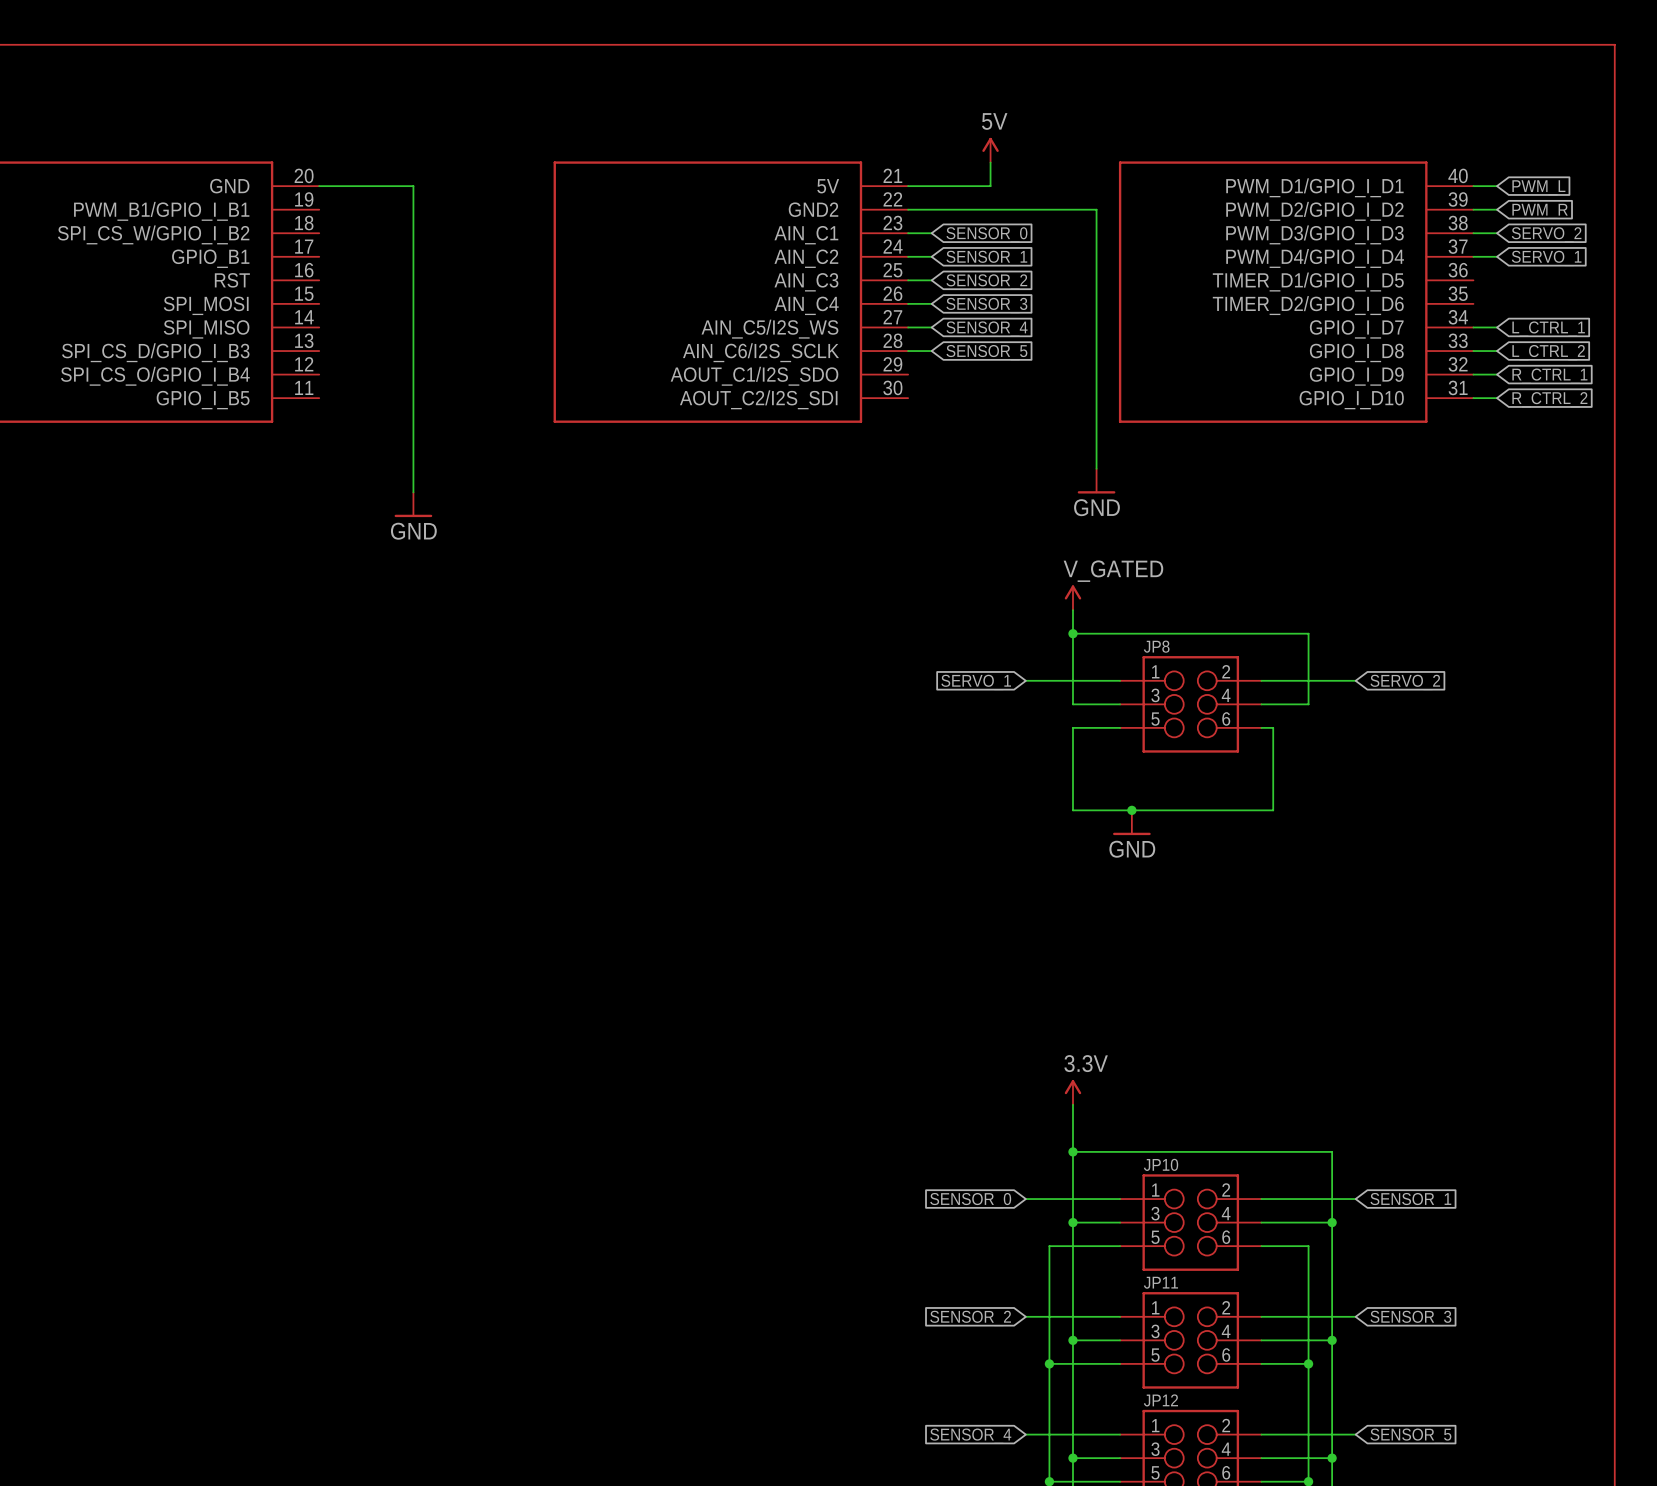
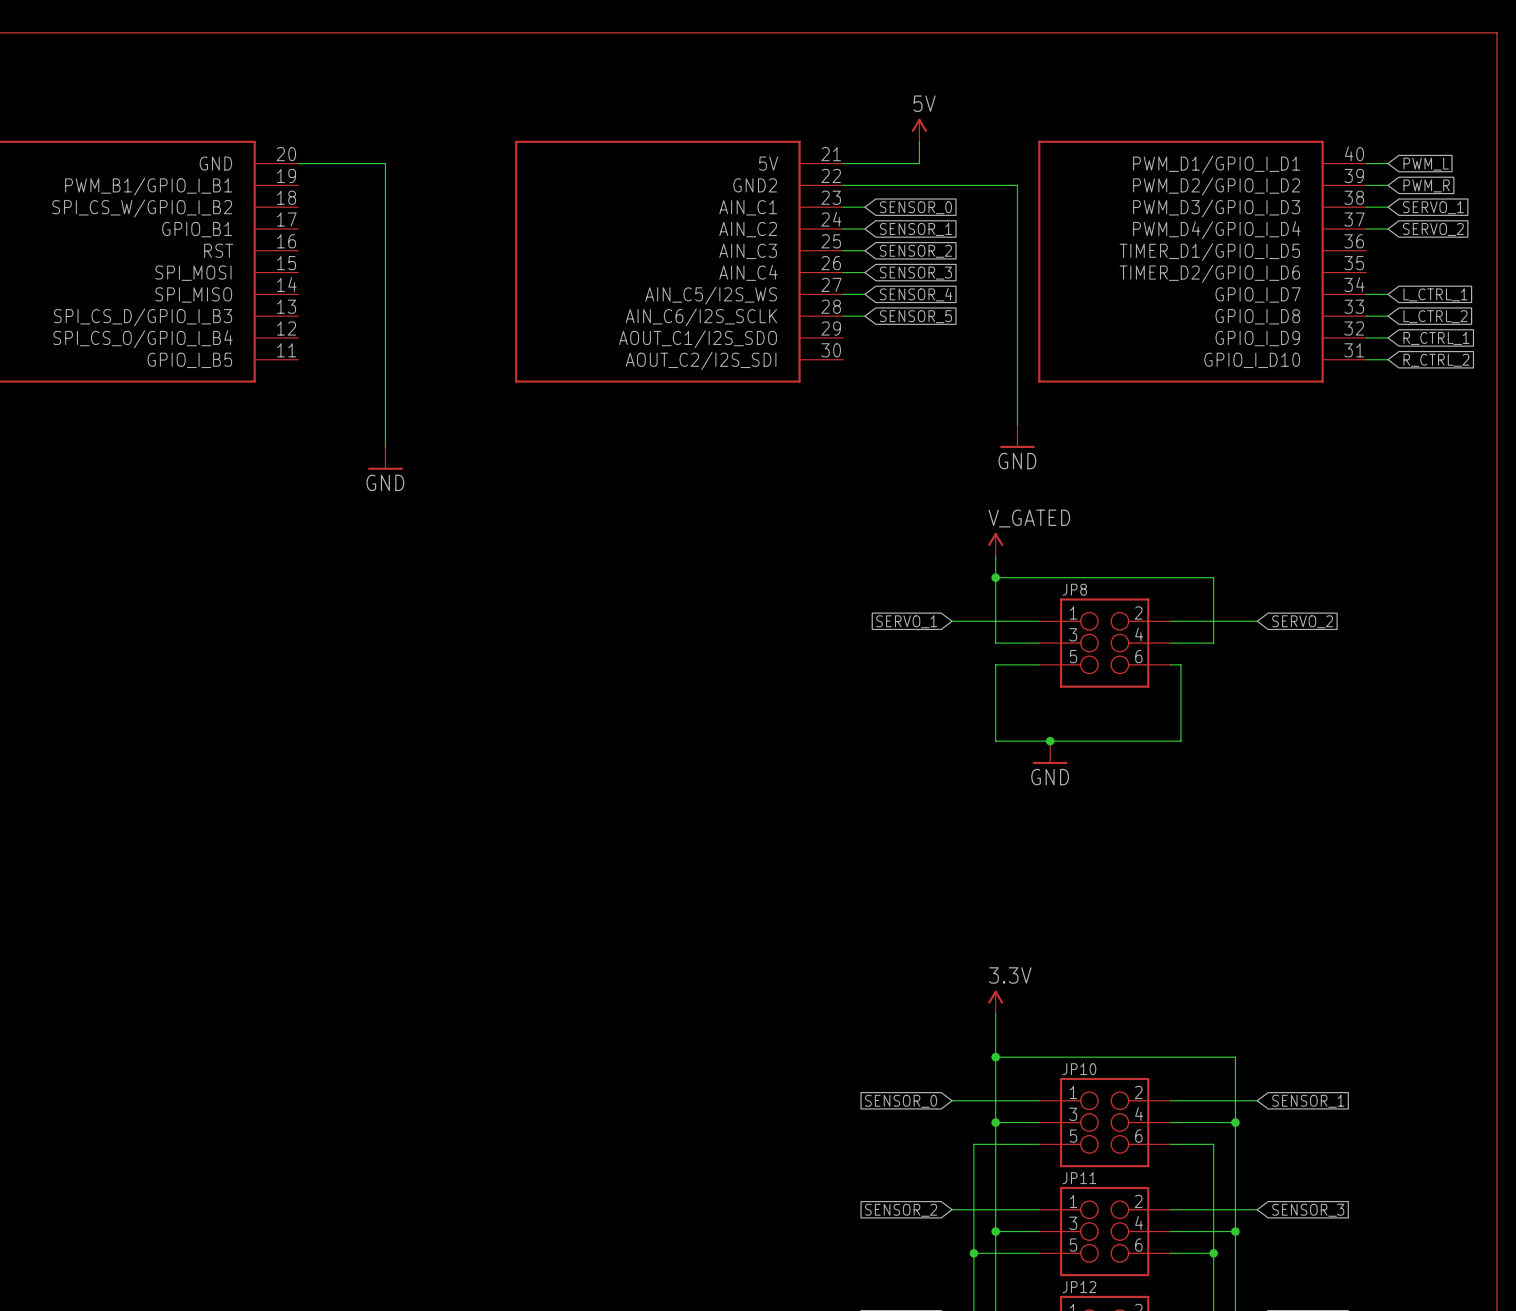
global label: SERVO_2 (1546, 234) -> SERVO_1 (1433, 207)
global label: SERVO_1 (1546, 258) -> SERVO_2 (1433, 229)

